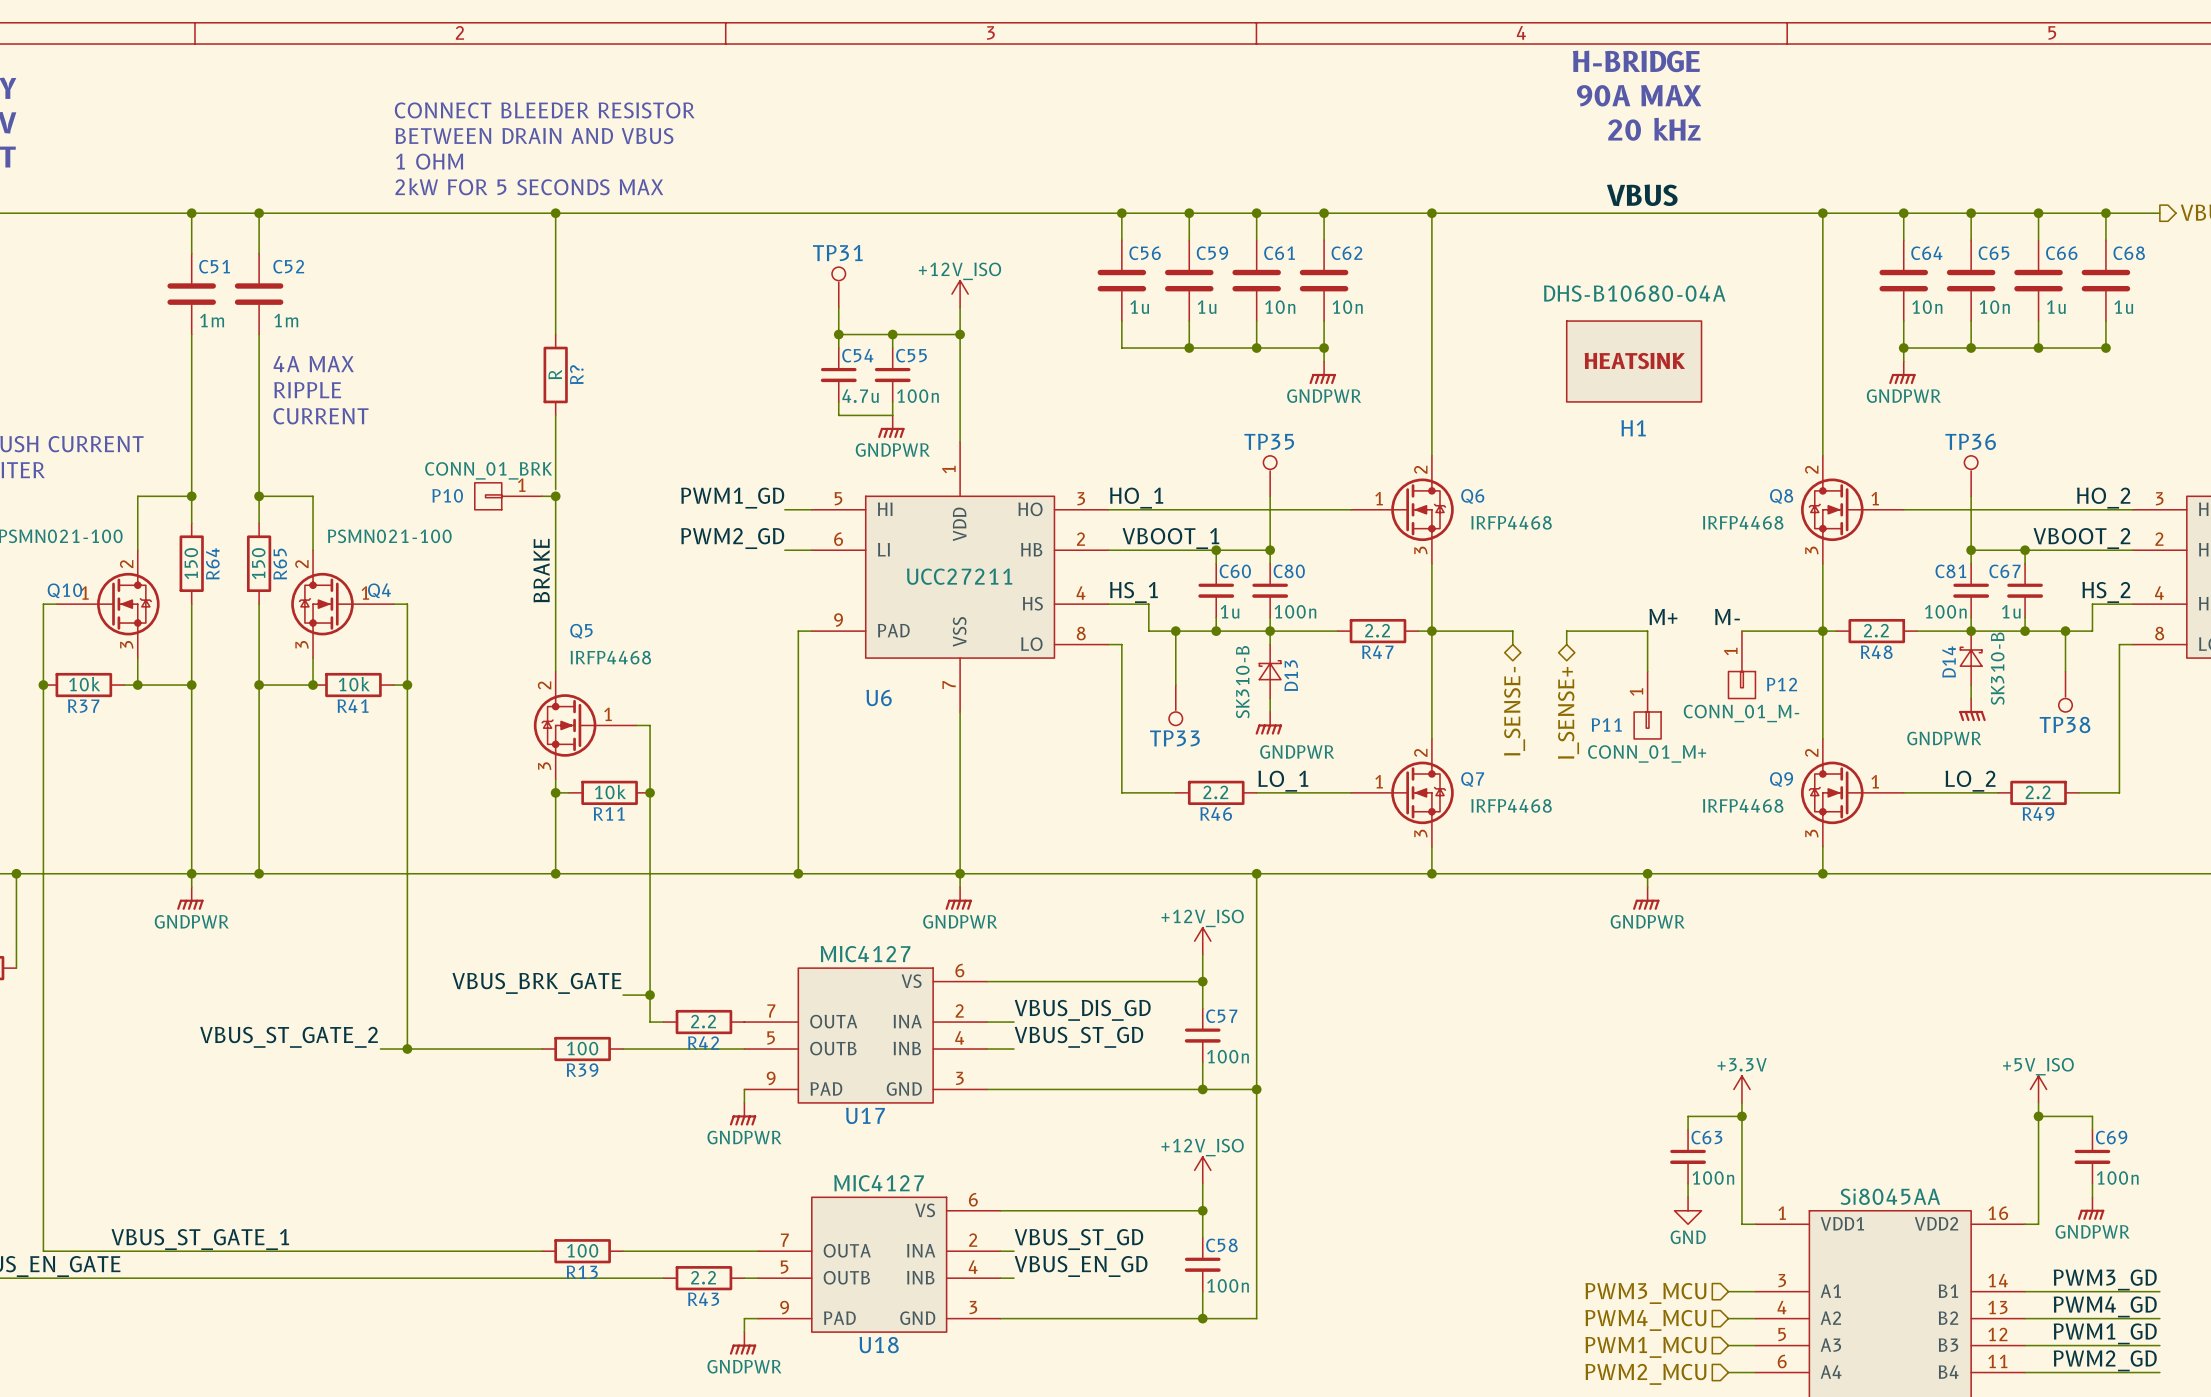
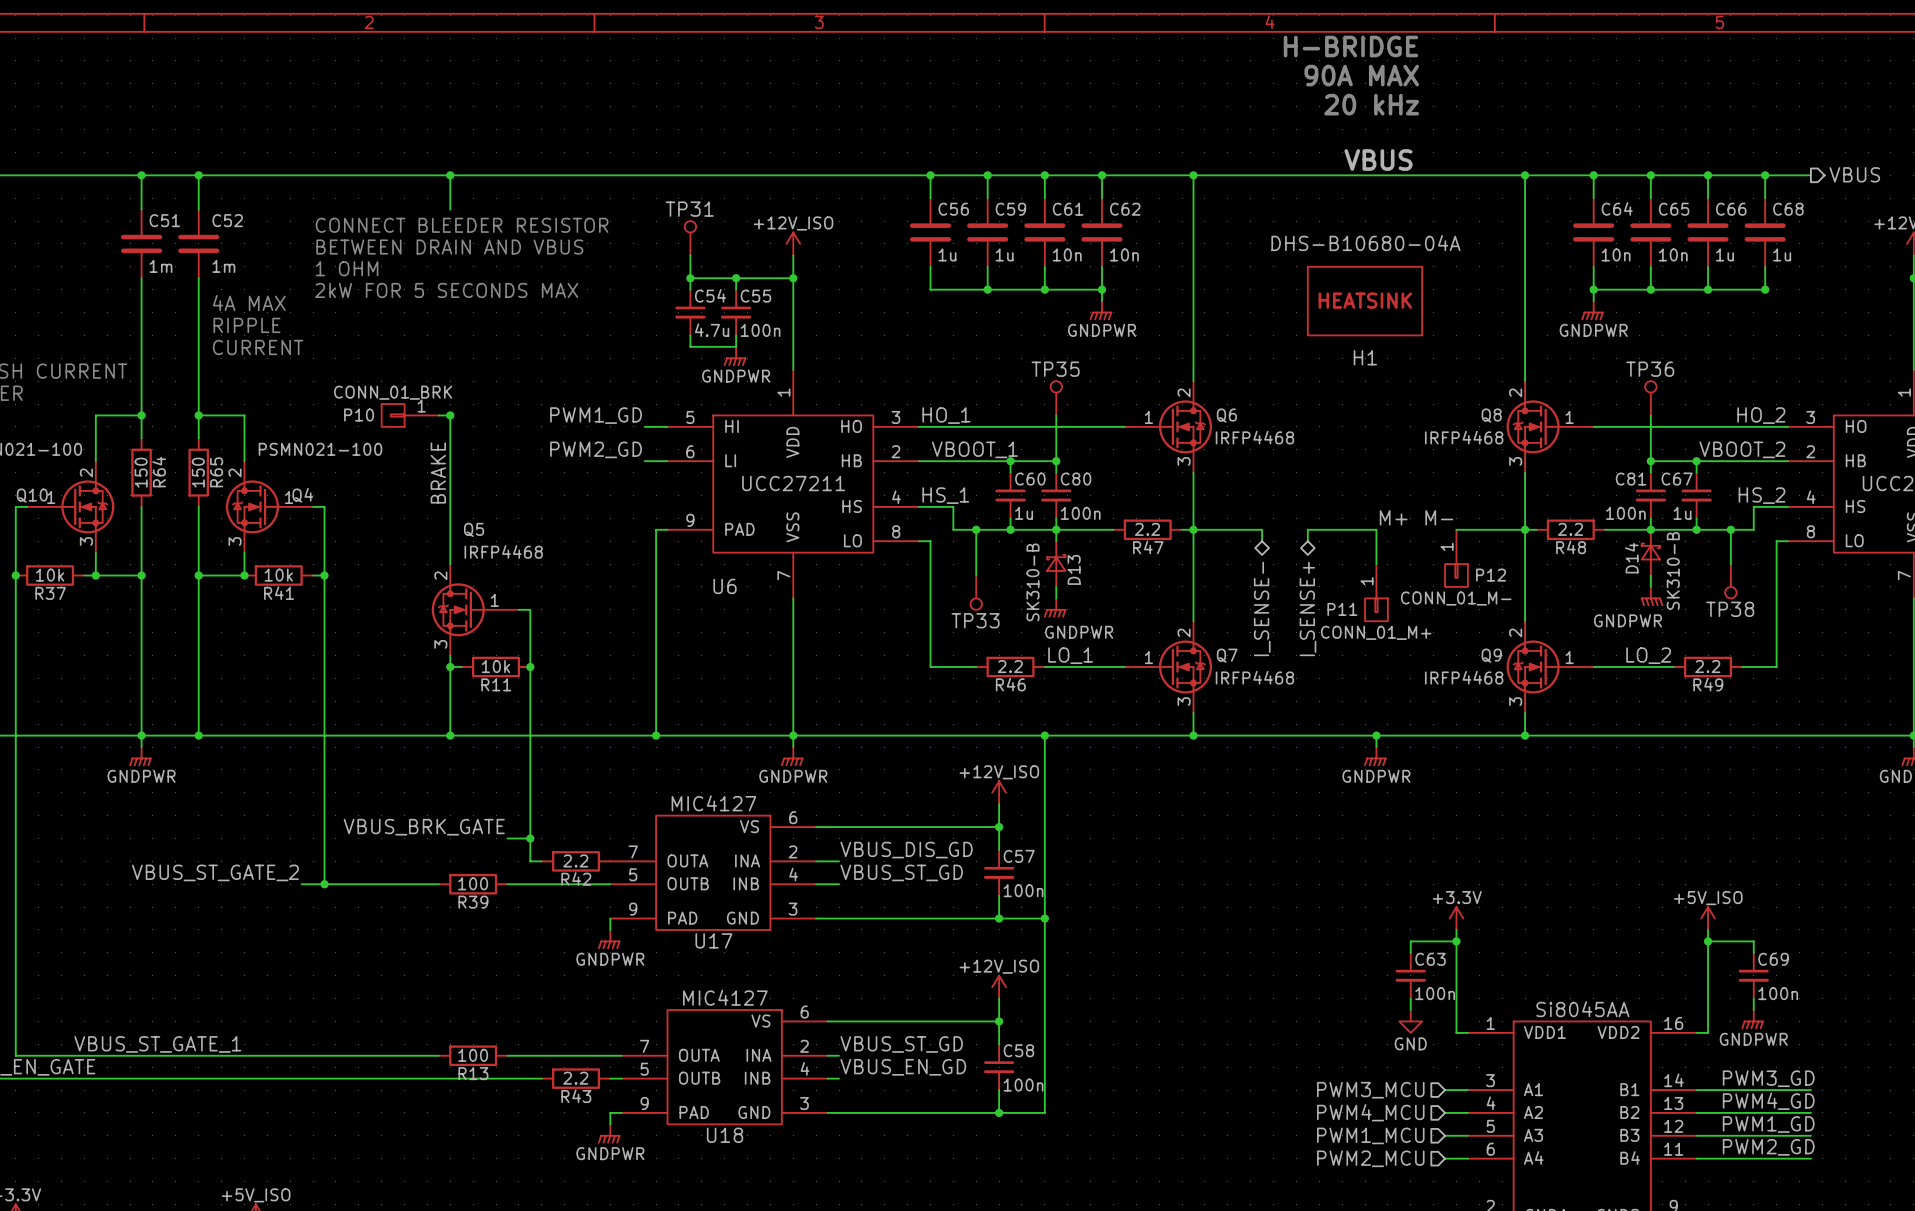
text position: CONNECT BLEEDER RESISTOR (544, 110) -> CONNECT BLEEDER RESISTOR (462, 225)
text position: BETWEEN DRAIN AND VBUS (534, 136) -> BETWEEN DRAIN AND VBUS (449, 247)
text position: 1 OHM (429, 161) -> 1 OHM (347, 268)
text position: 2kW FOR 5 SECONDS MAX (529, 186) -> 2kW FOR 5 SECONDS MAX (446, 290)
wire: (555, 253) (555, 334) -> none
R?: R (555, 374) -> none
wire: (555, 415) (555, 489) -> none

